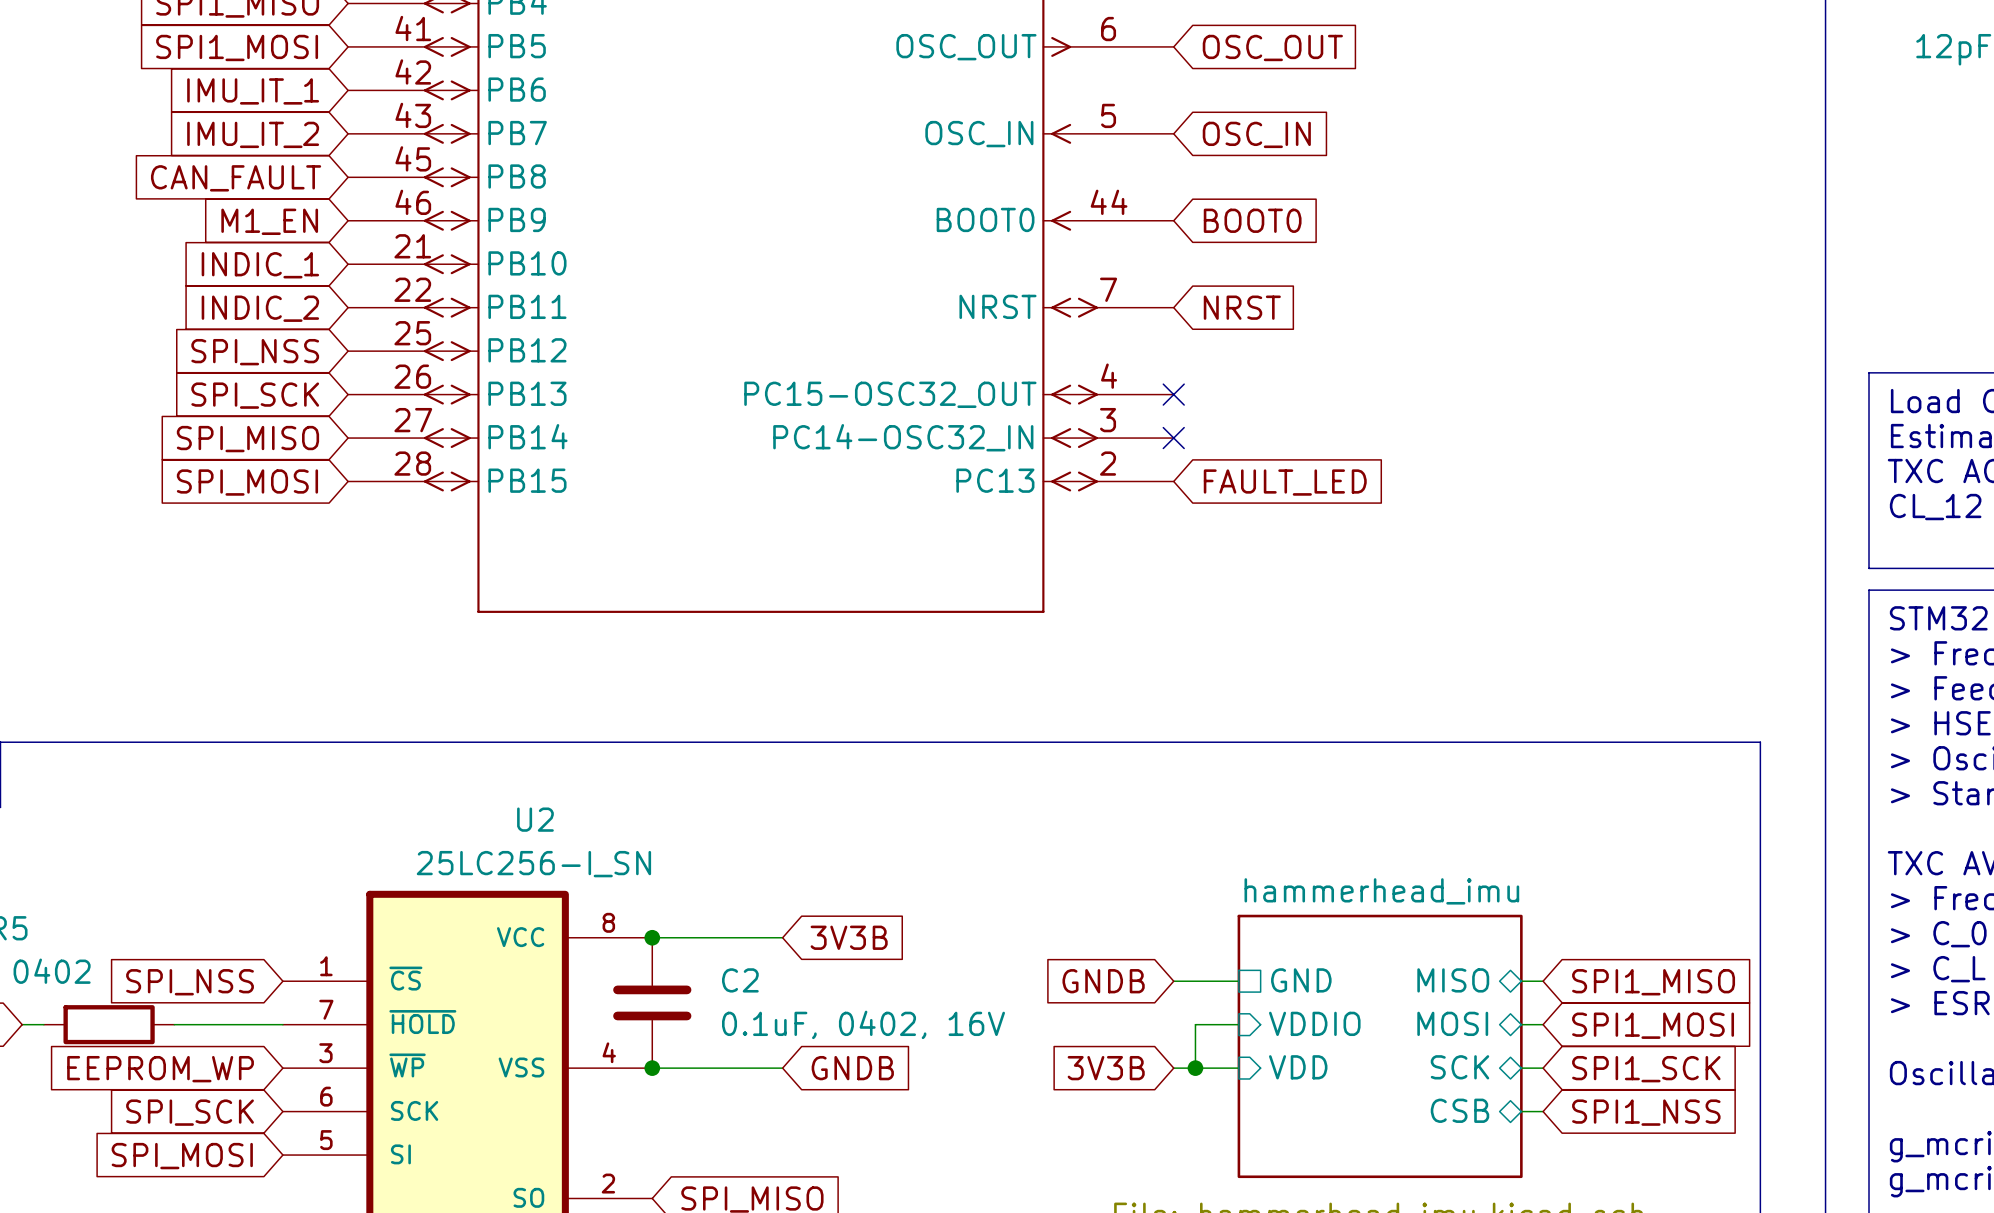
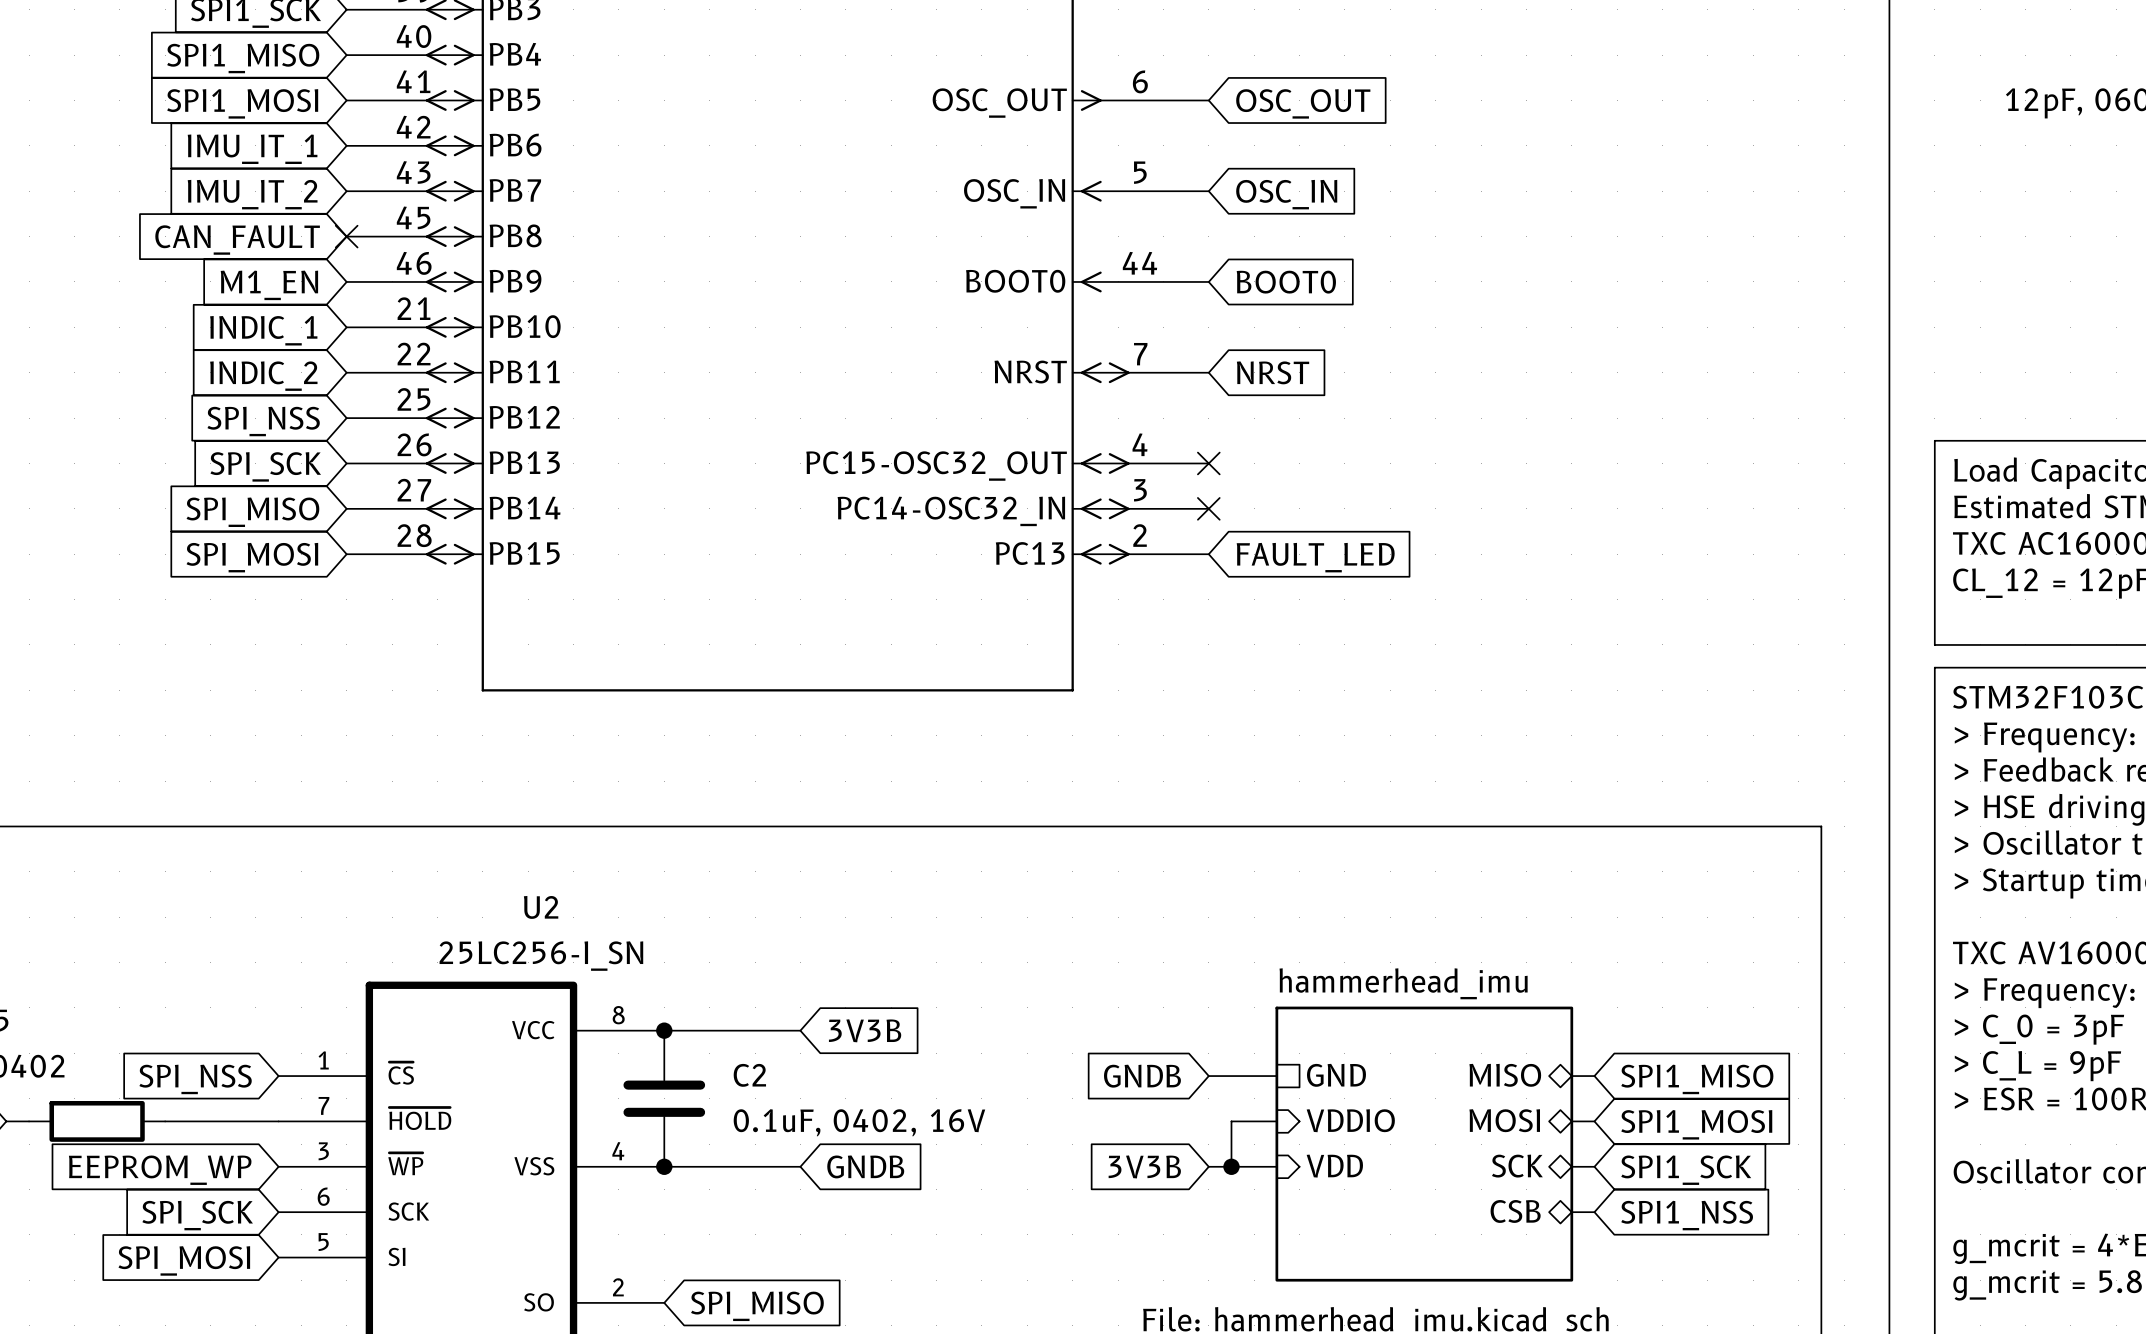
no-connect mark: none -> (346, 236)

